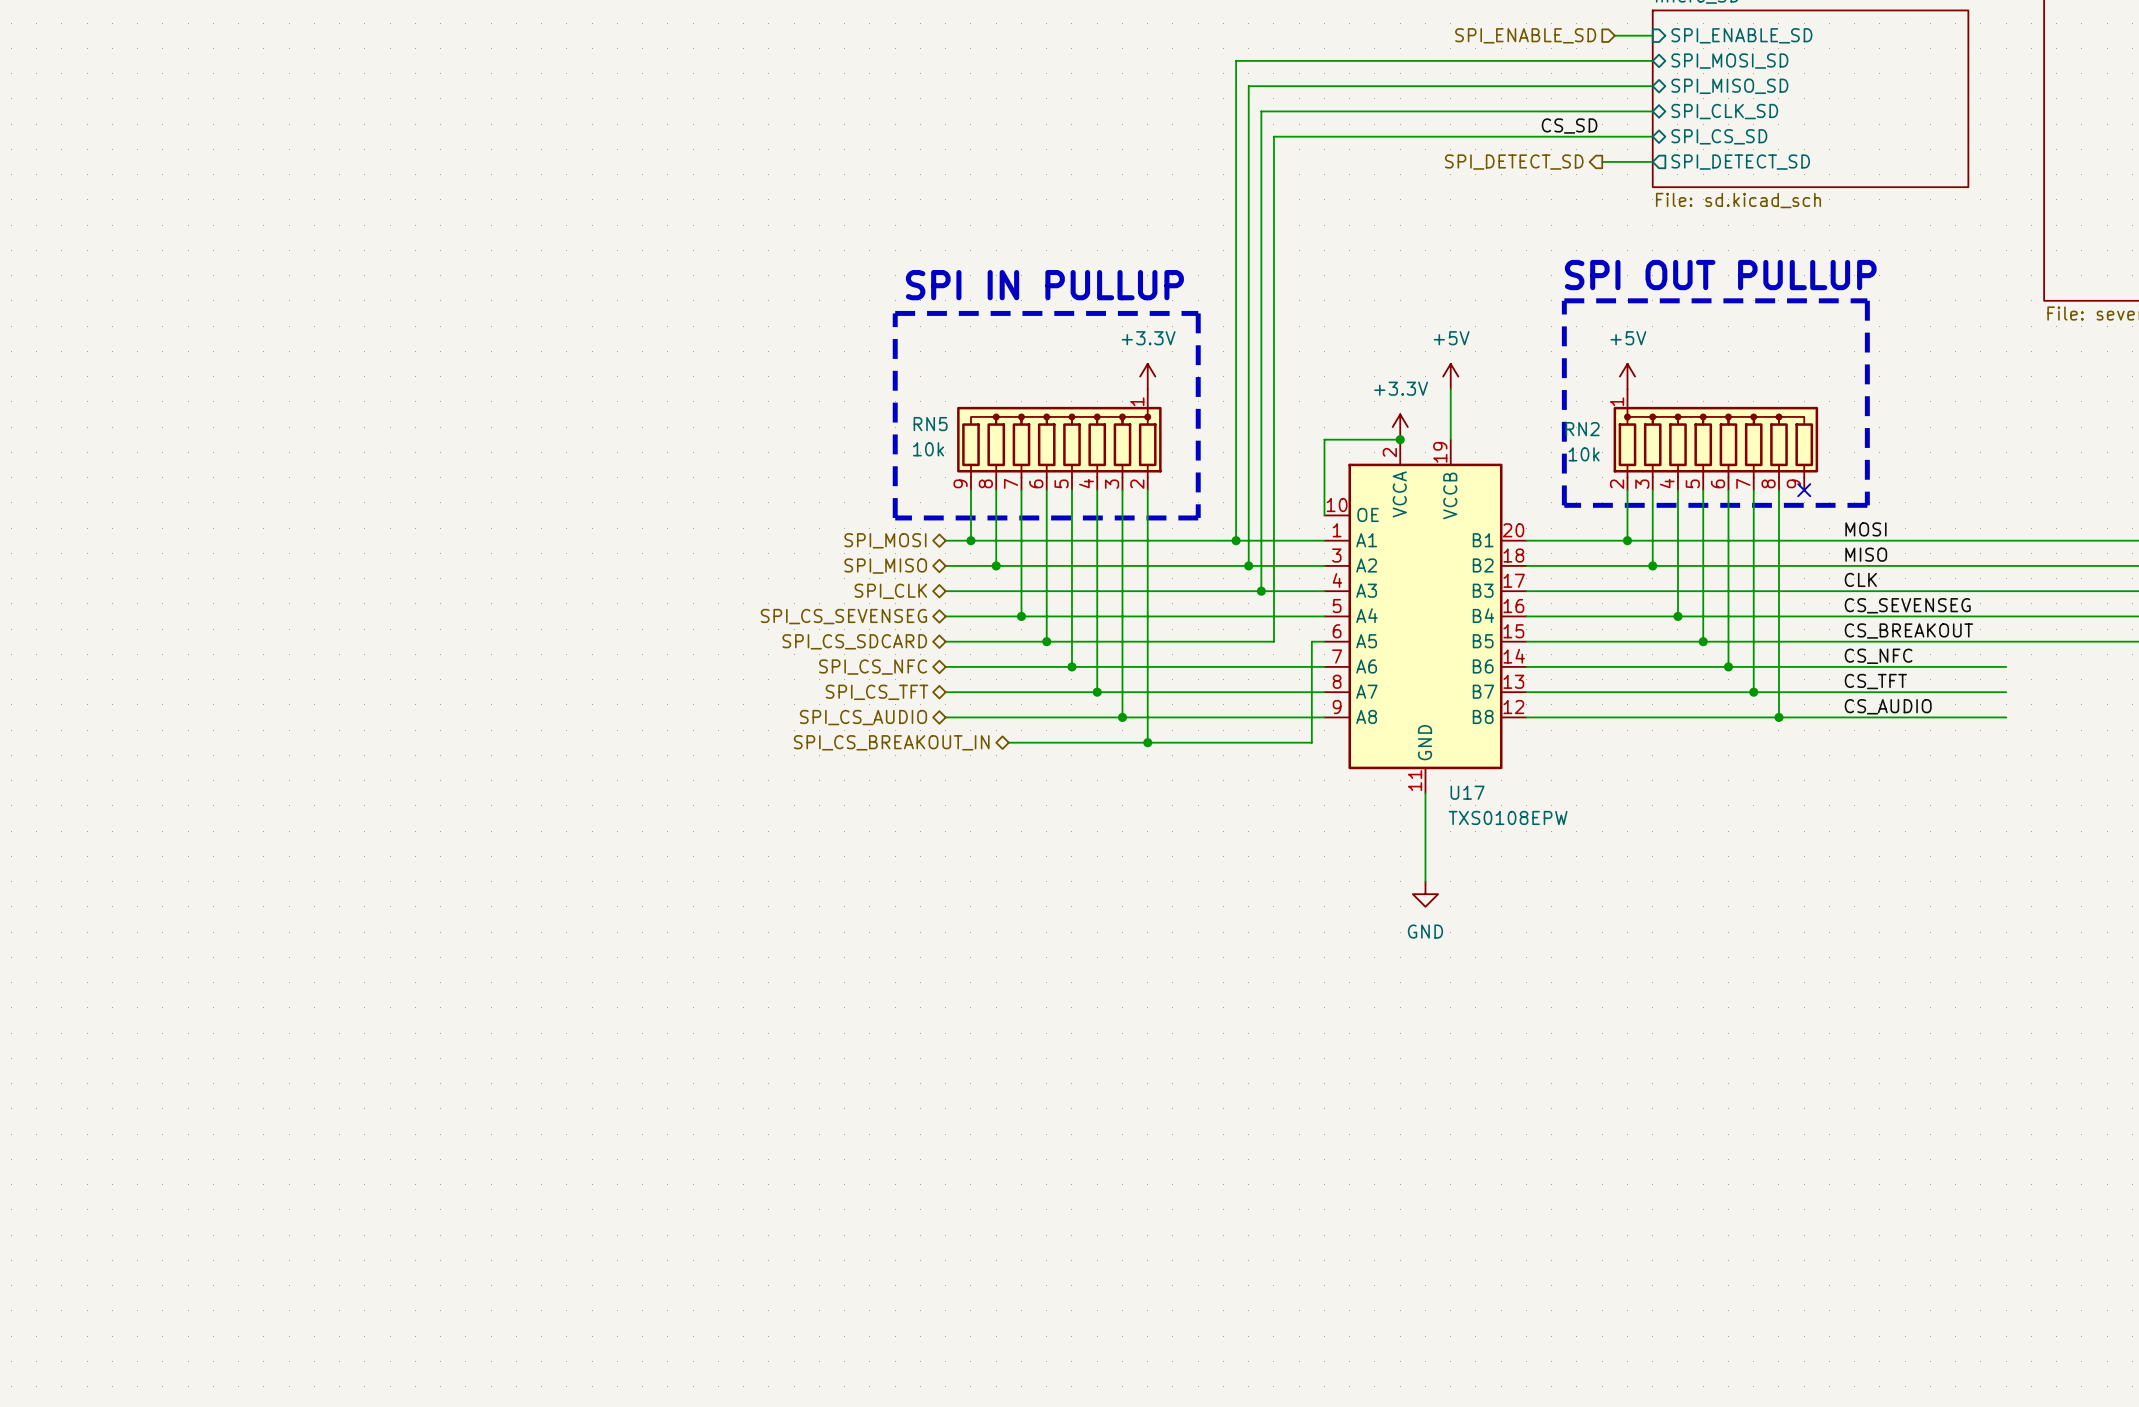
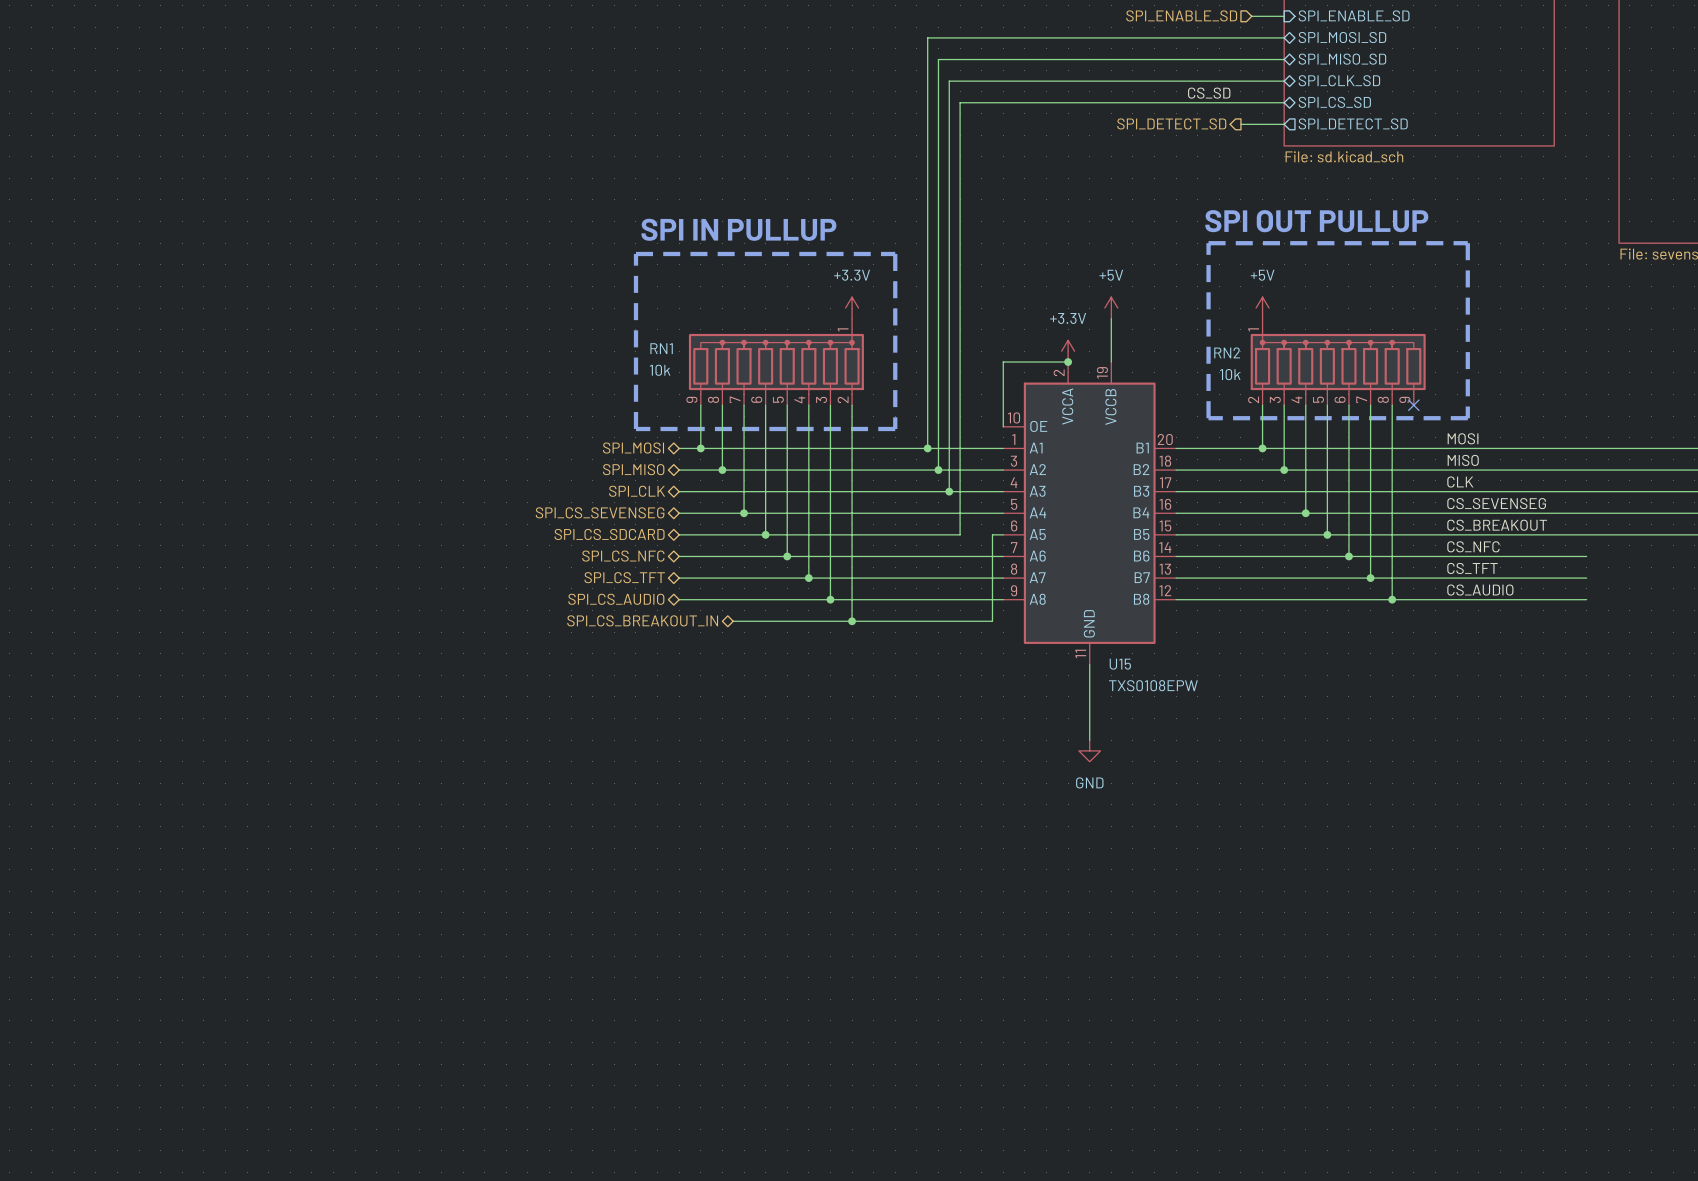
RN5 name: RN5 (930, 424) -> RN1 (661, 348)
U17 name: U17 (1467, 792) -> U15 (1120, 664)

